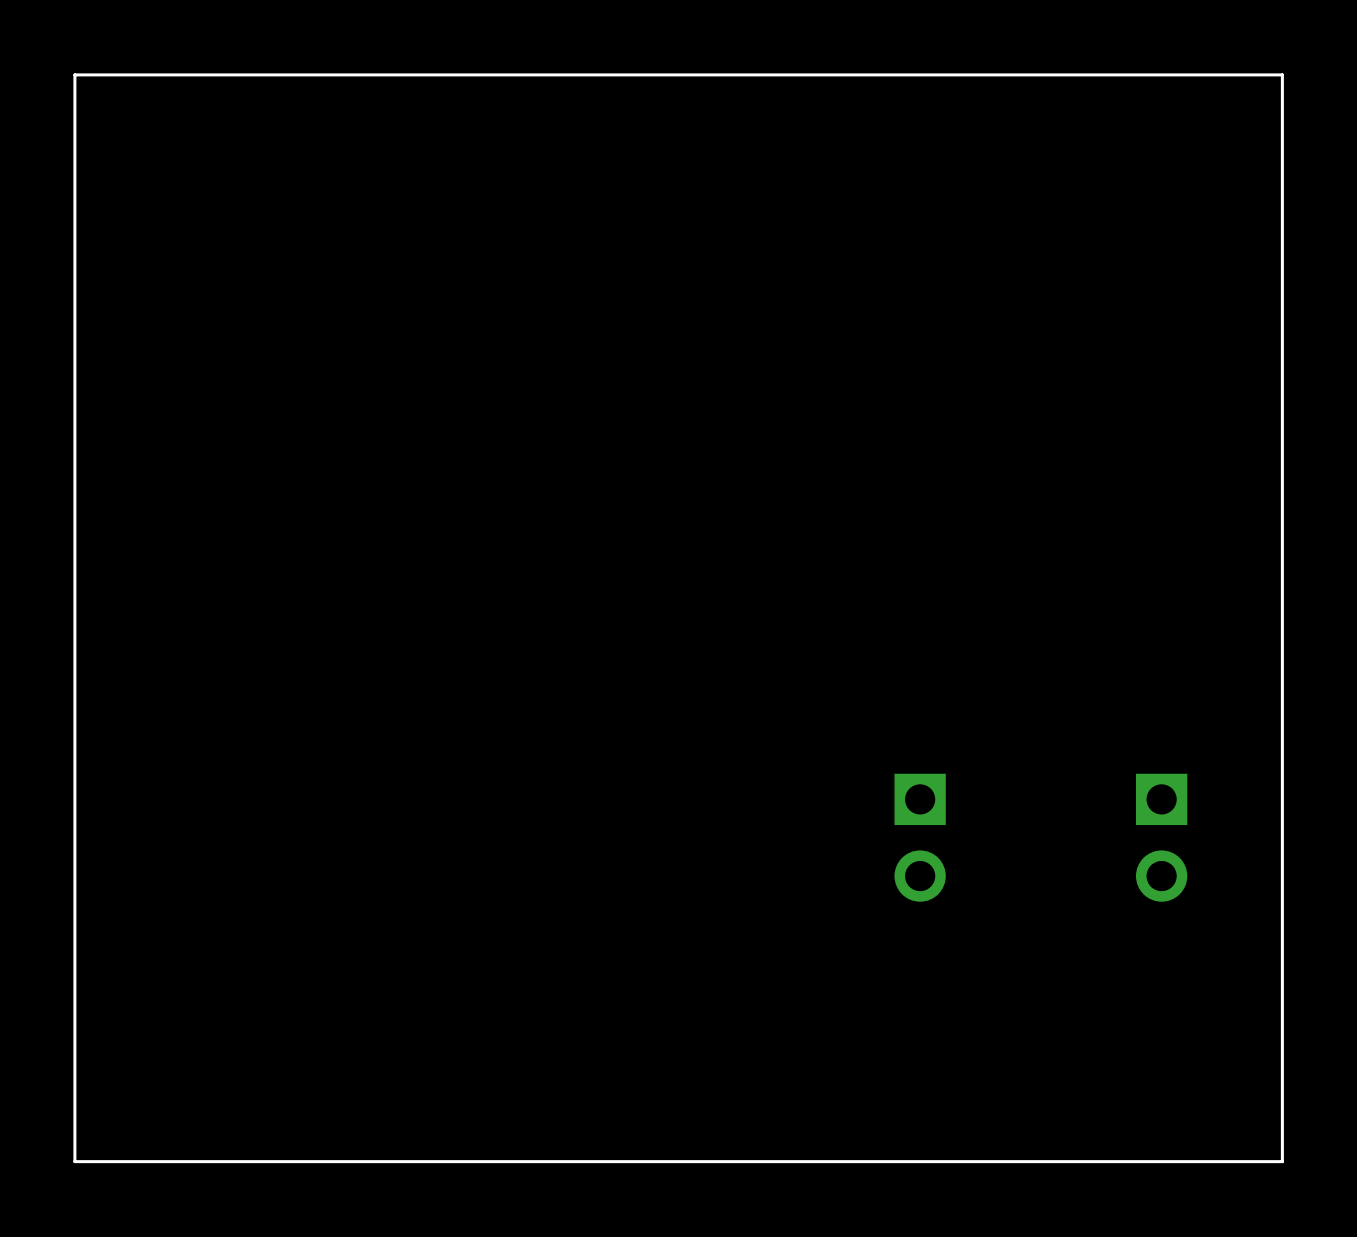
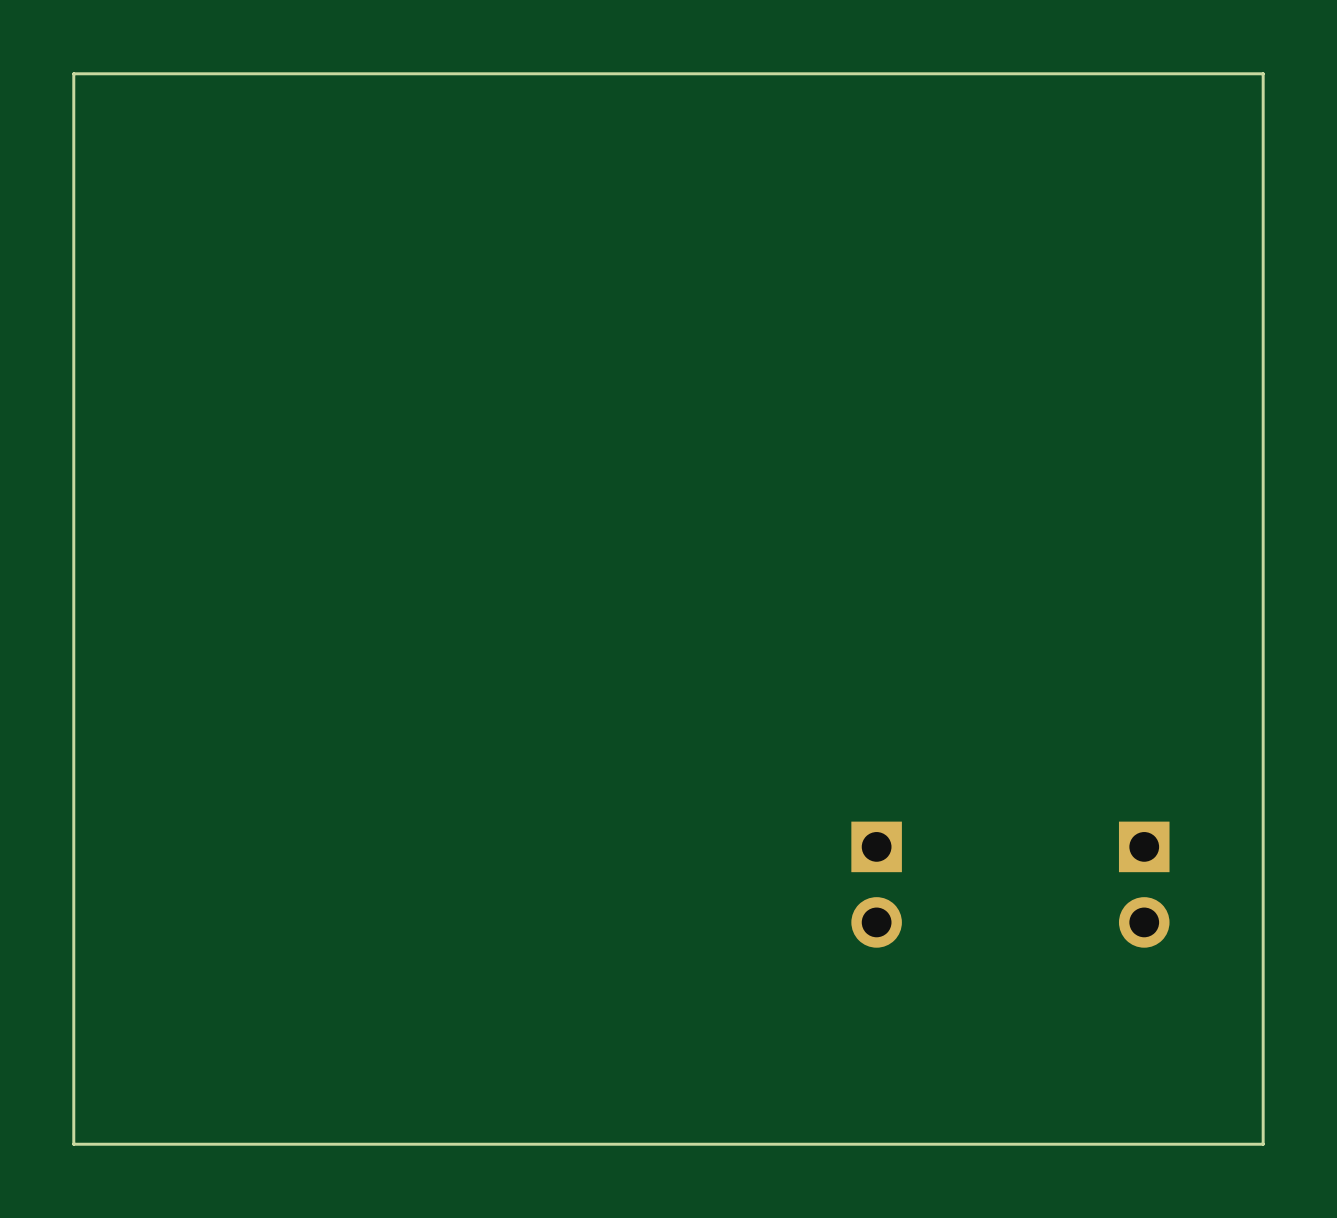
part position: (920, 837) -> (876, 884)
part position: (1161, 837) -> (1144, 884)

